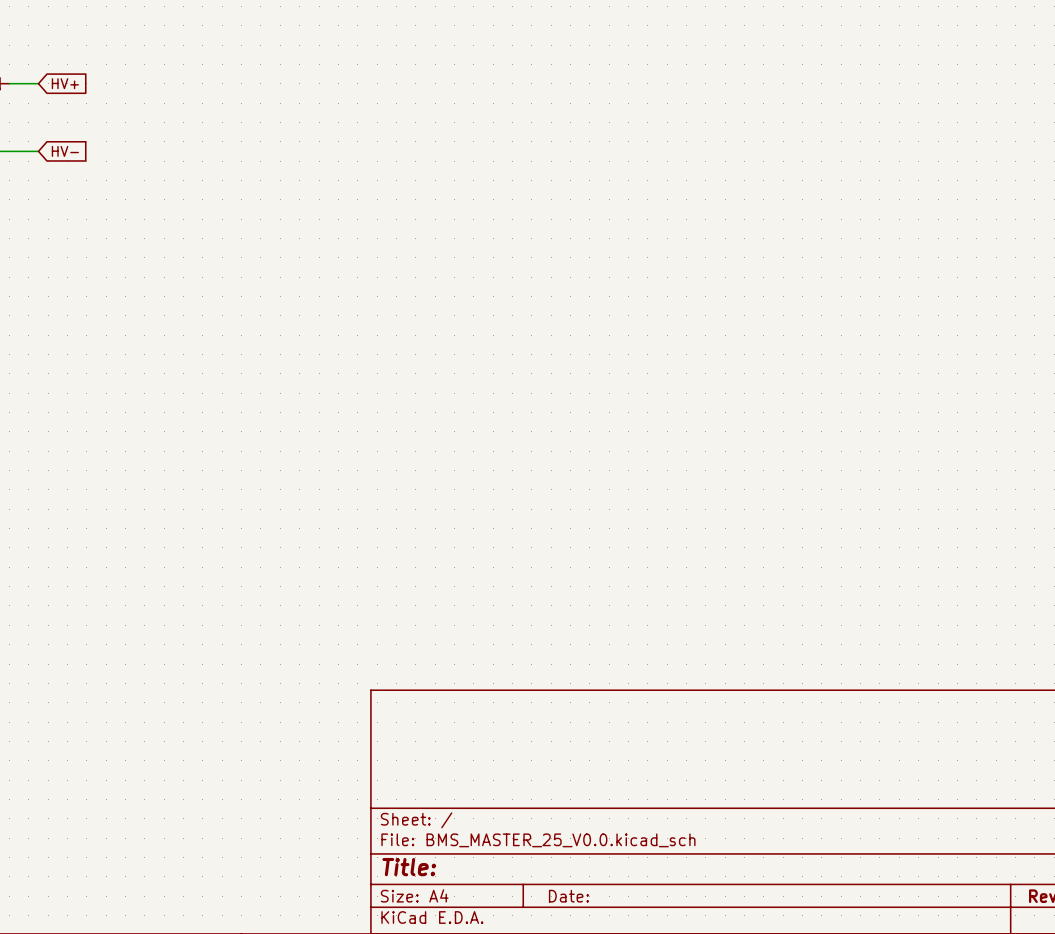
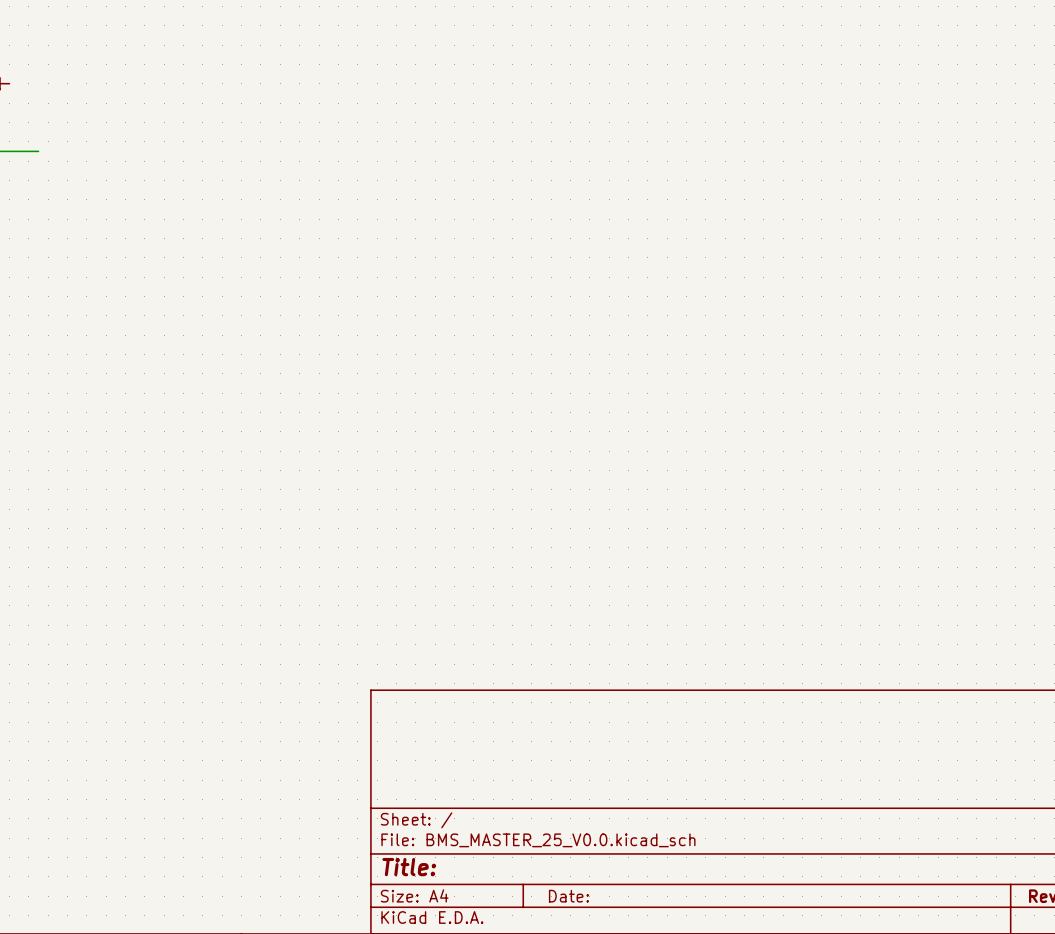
wire: (9, 83) (38, 83) -> none
global label: HV+ (65, 83) -> none
global label: HV- (65, 151) -> none

